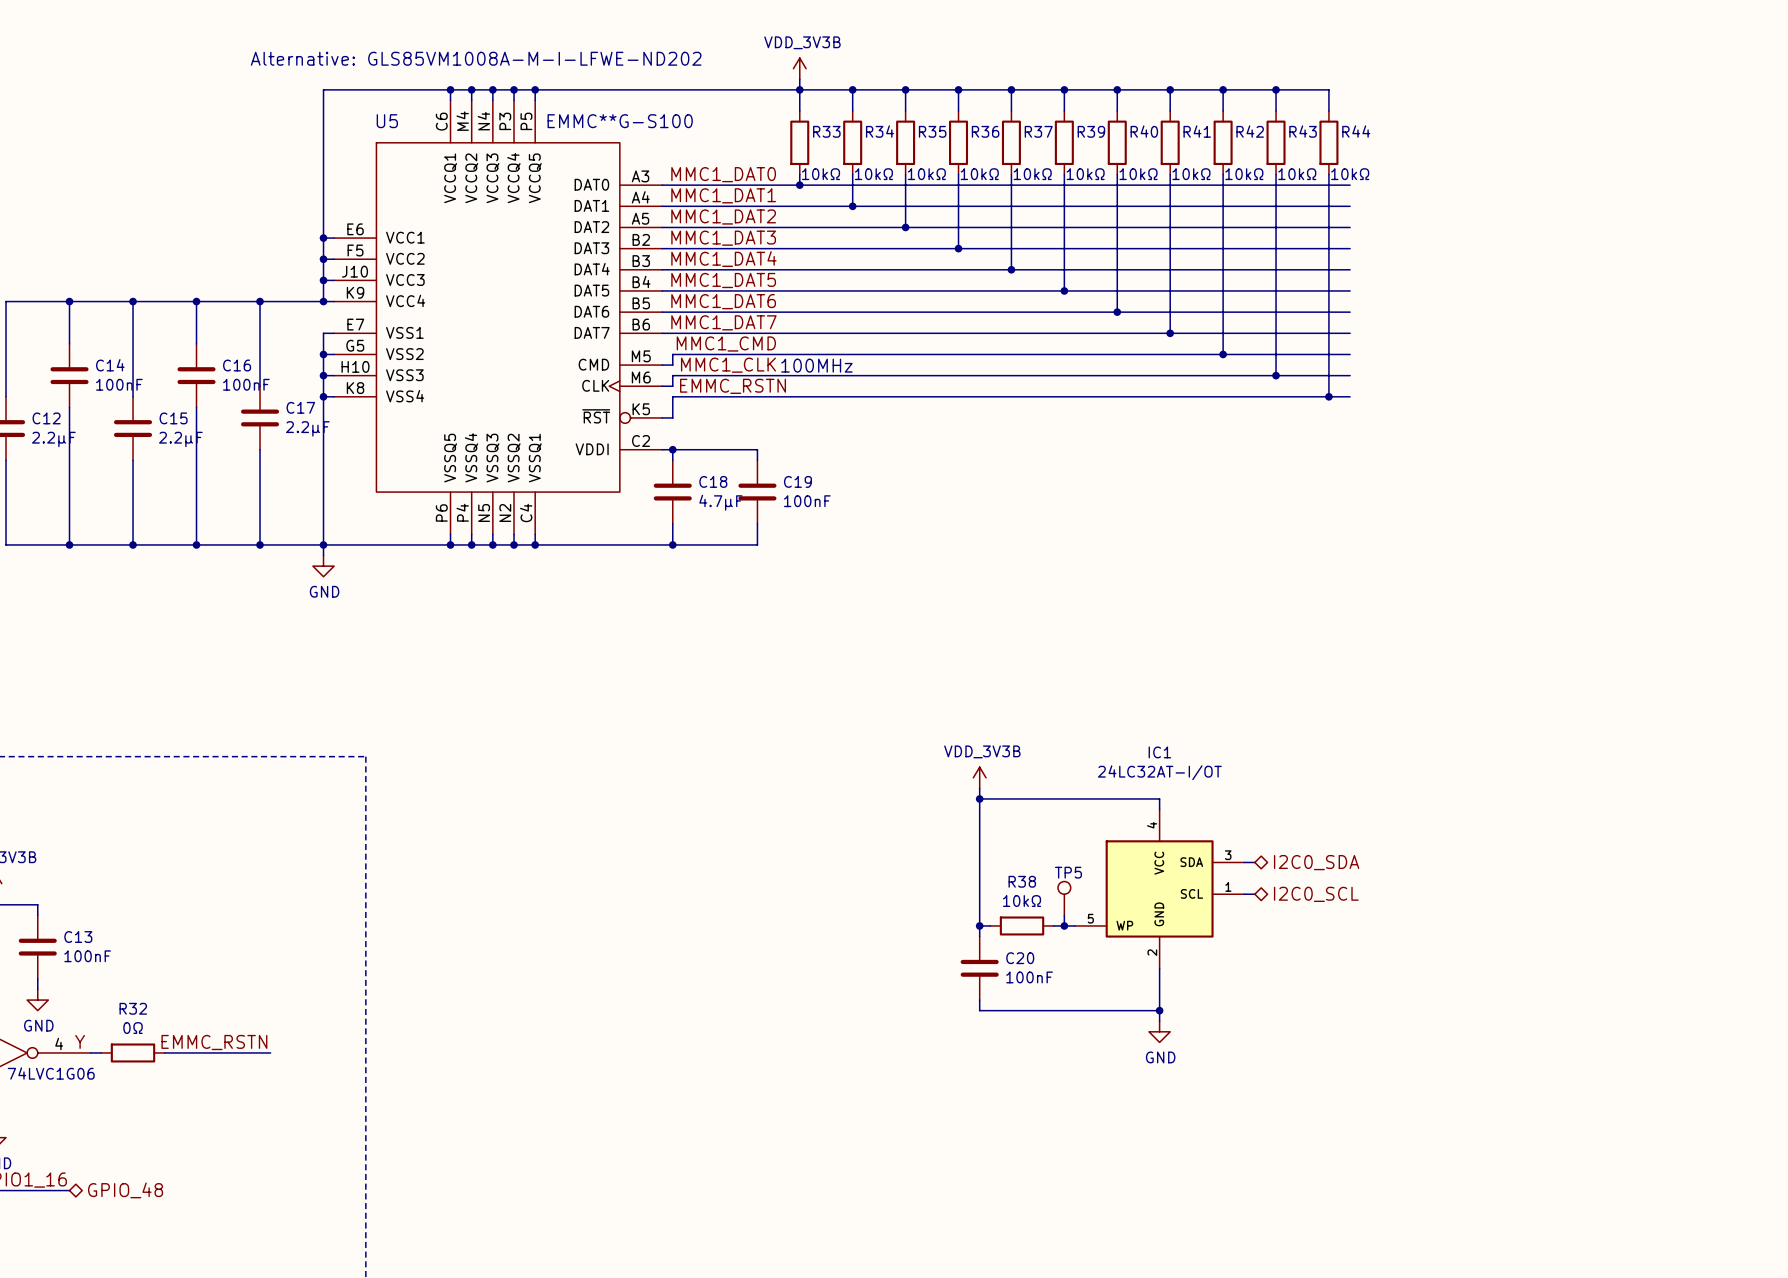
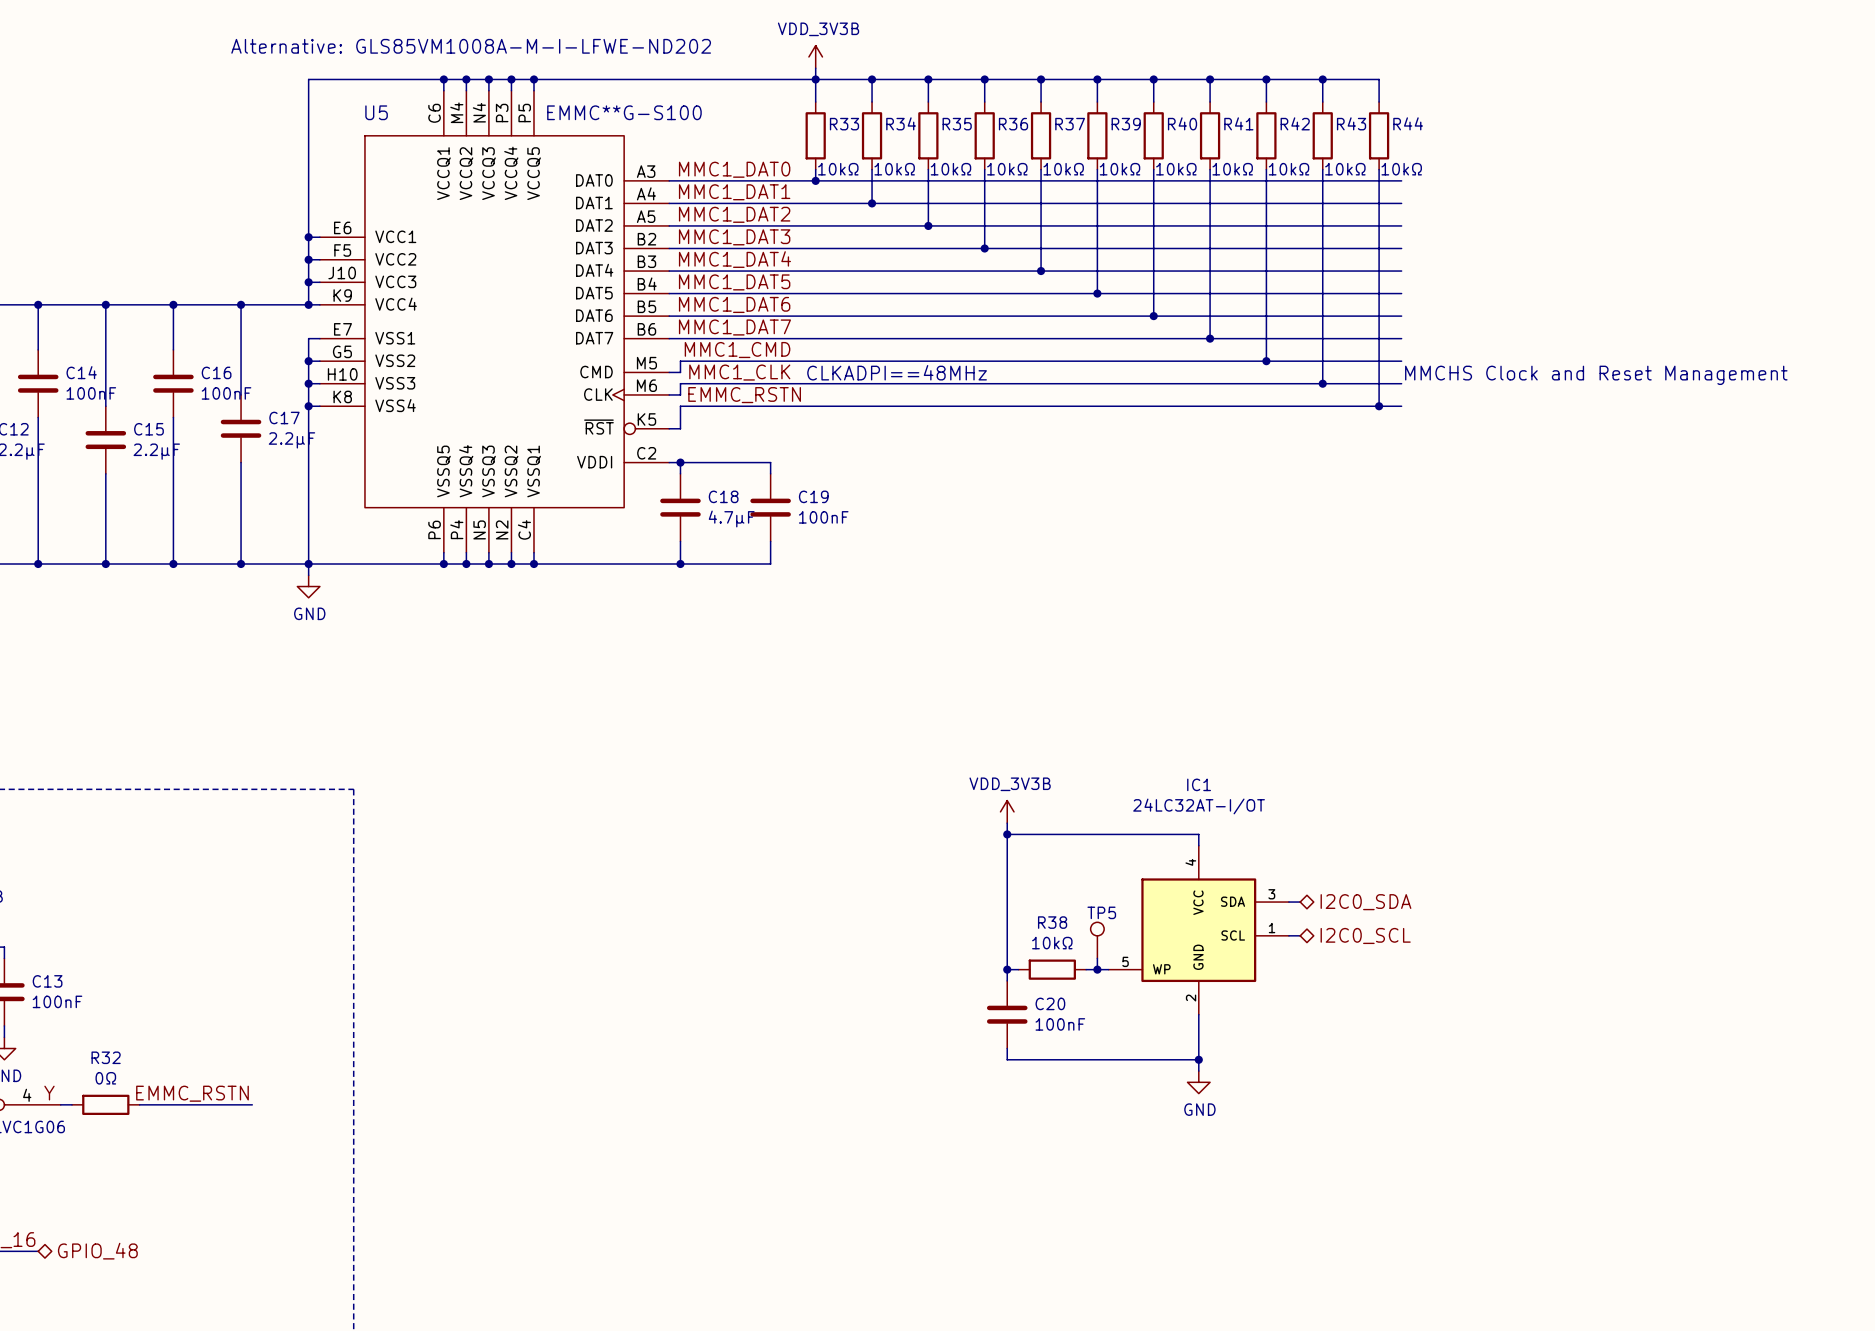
text: 100MHz (816, 365) -> none
text: none -> CLKADPI==48MHz (897, 372)
text: none -> MMCHS Clock and Reset Management (1596, 375)

